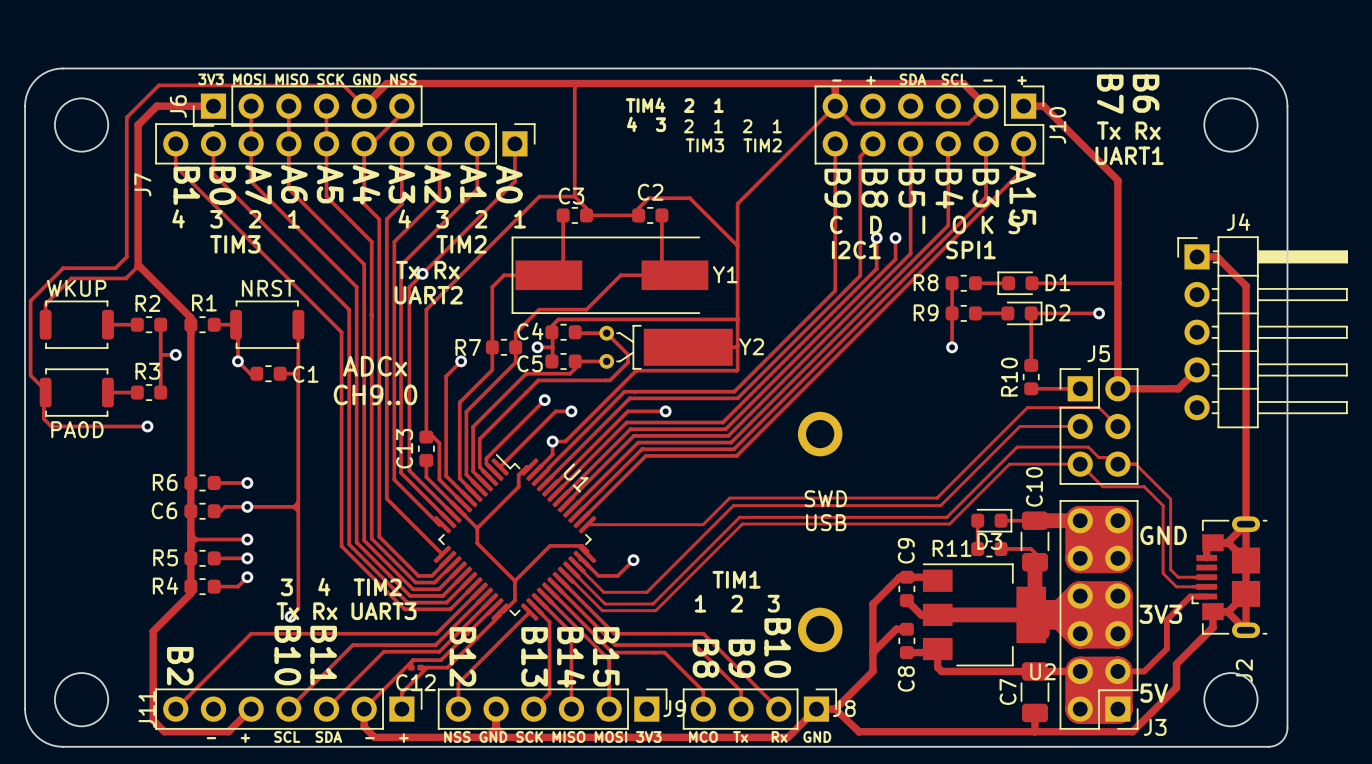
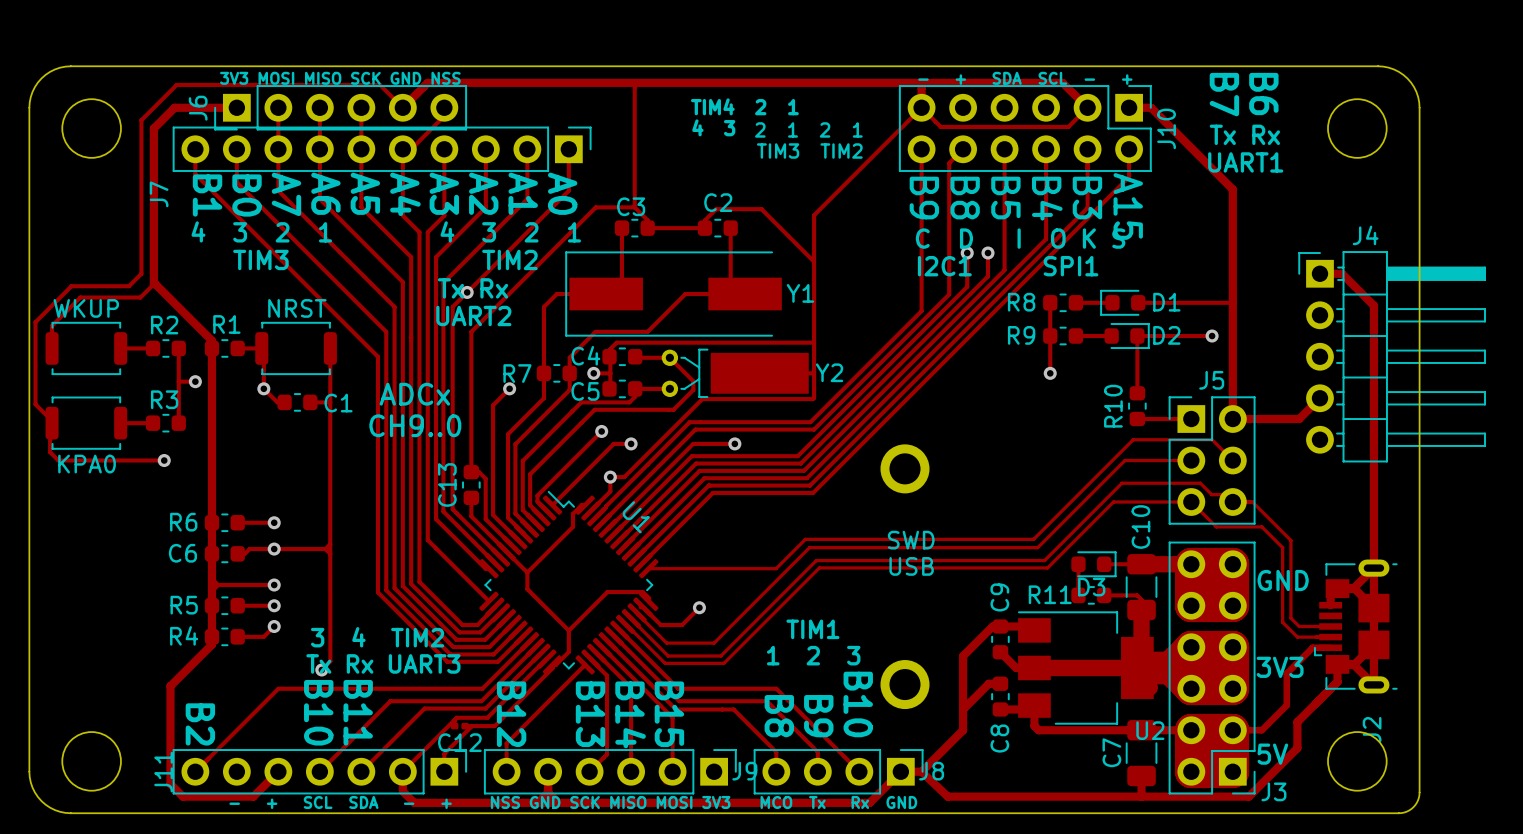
PA0D name: PA0D (77, 429) -> KPA0 (87, 464)

